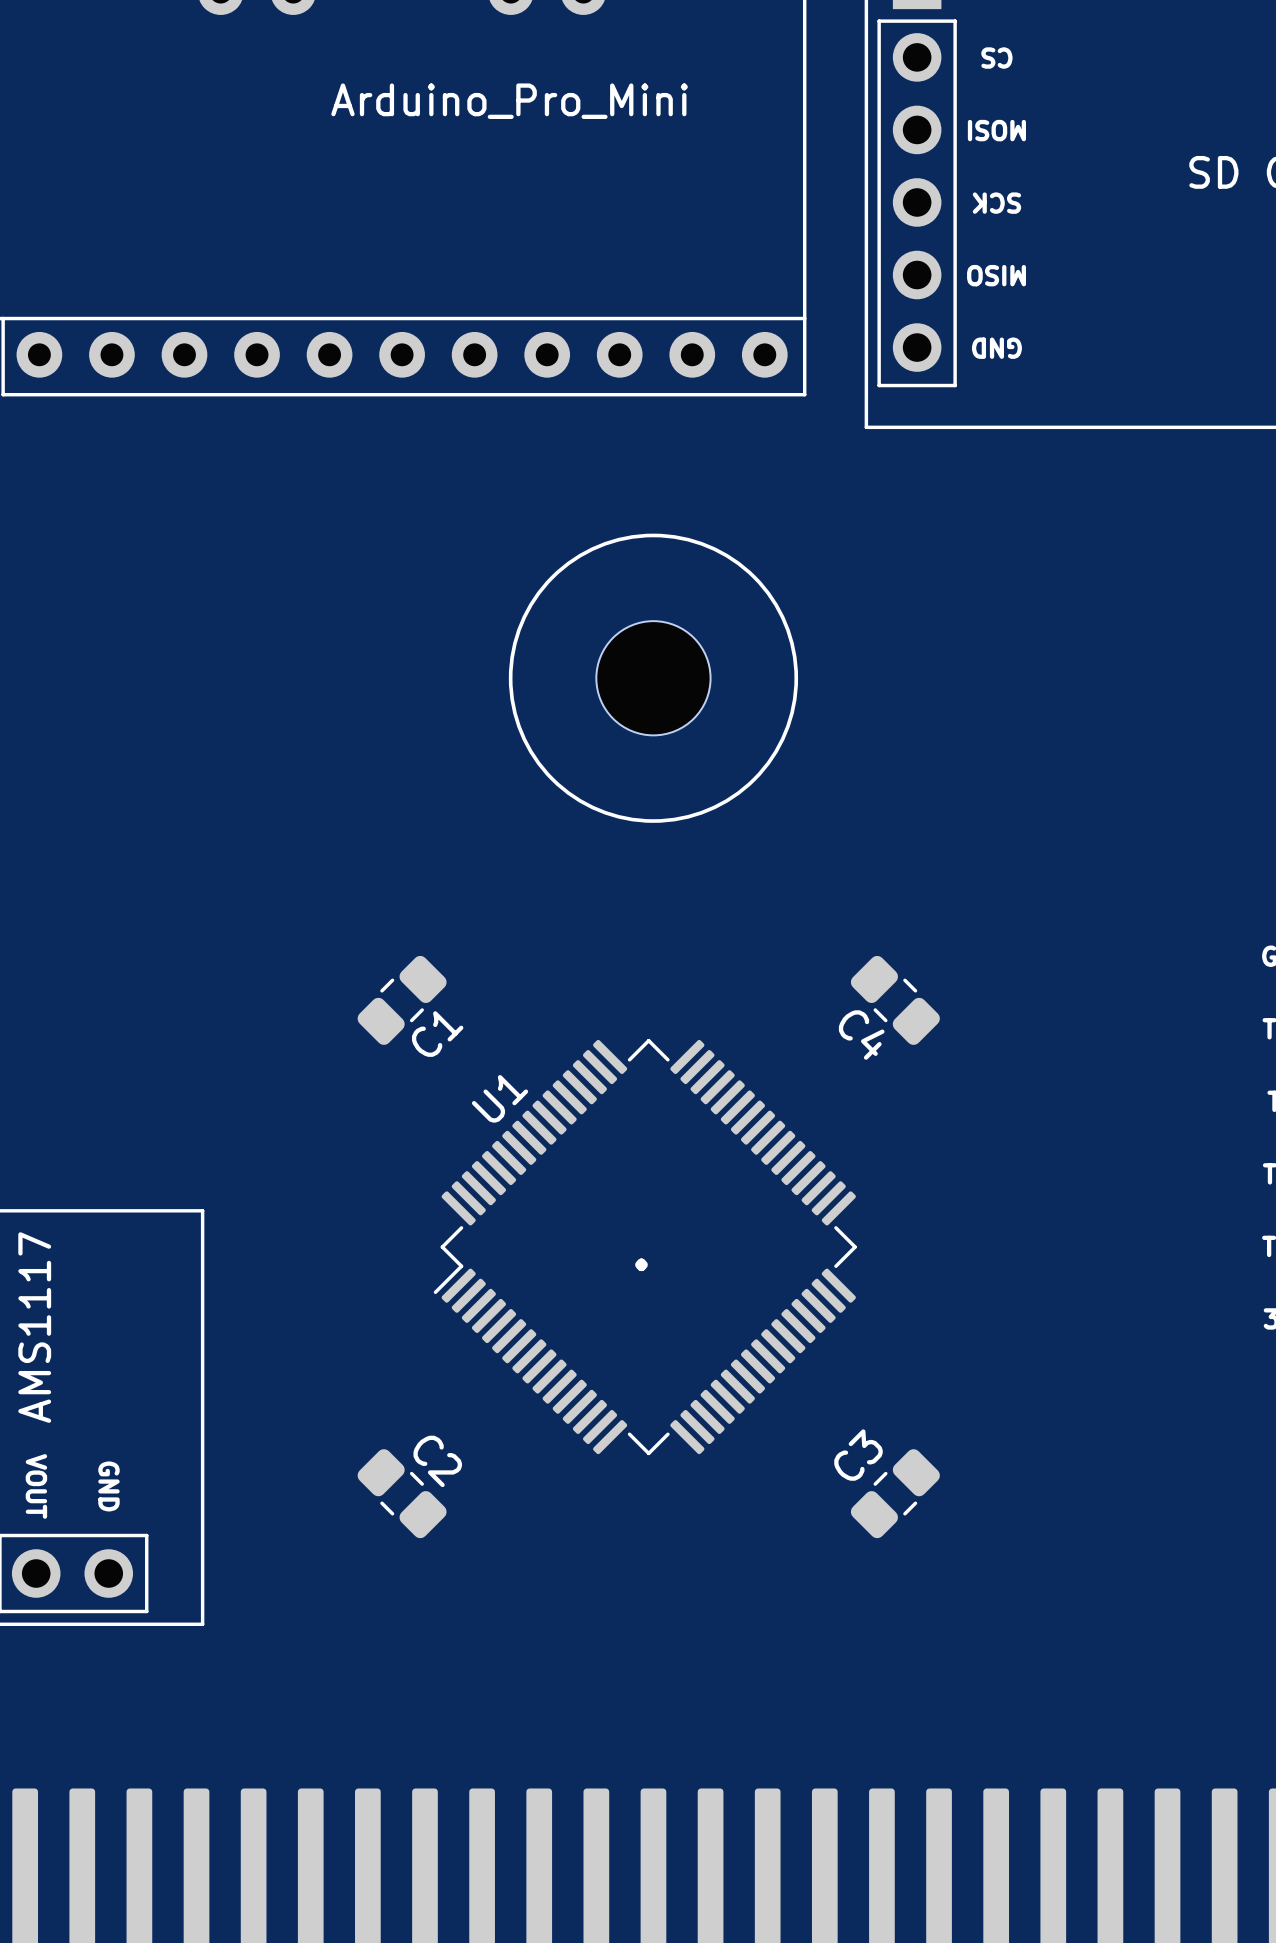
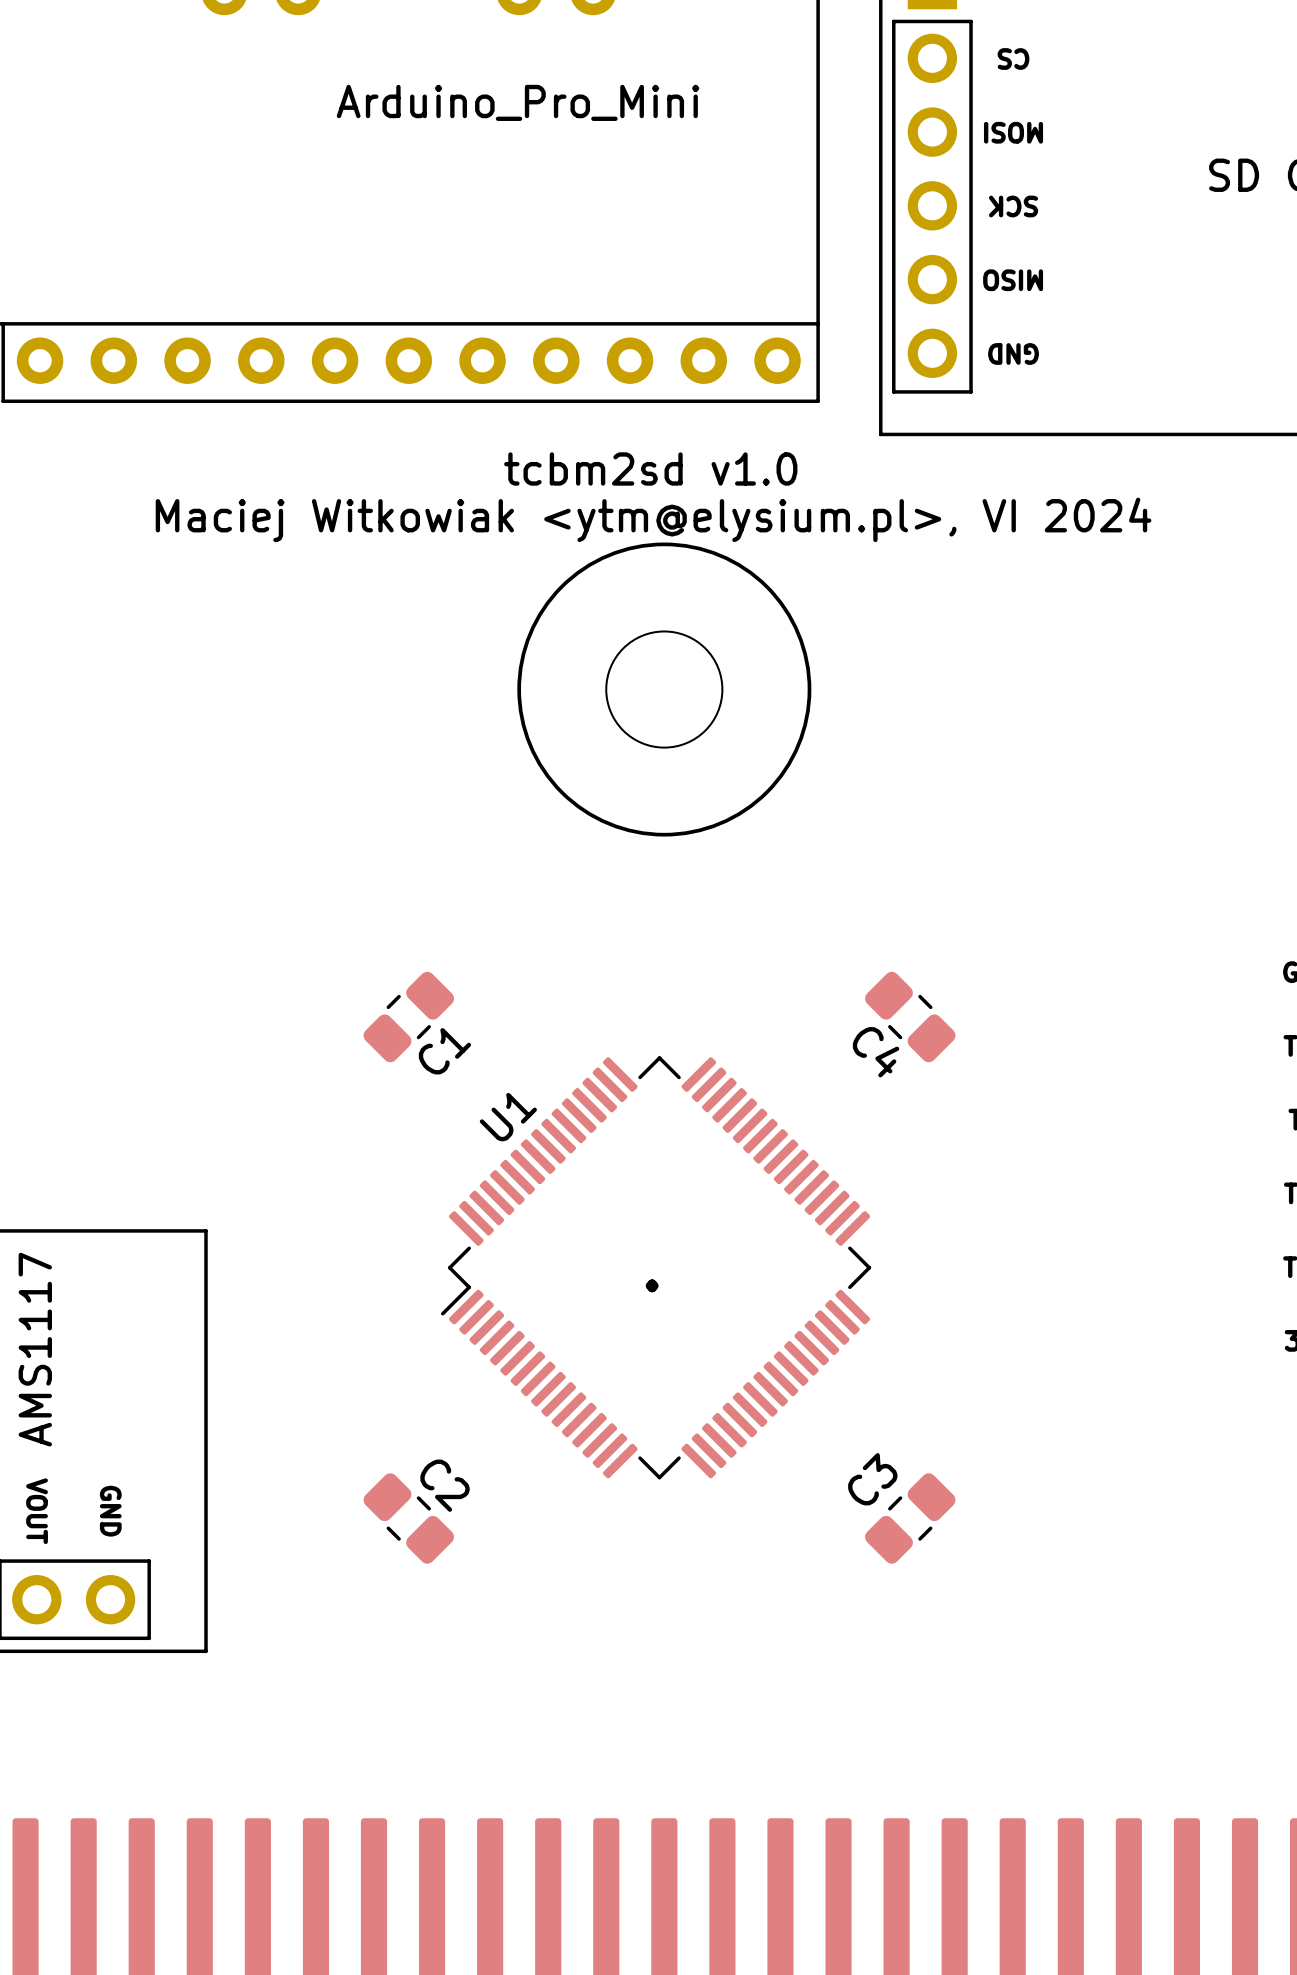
text: none -> tcbm2sd v1.0 (650, 468)
text: none -> Maciej Witkowiak <ytm@elysium.pl>, VI 2024 (653, 519)

